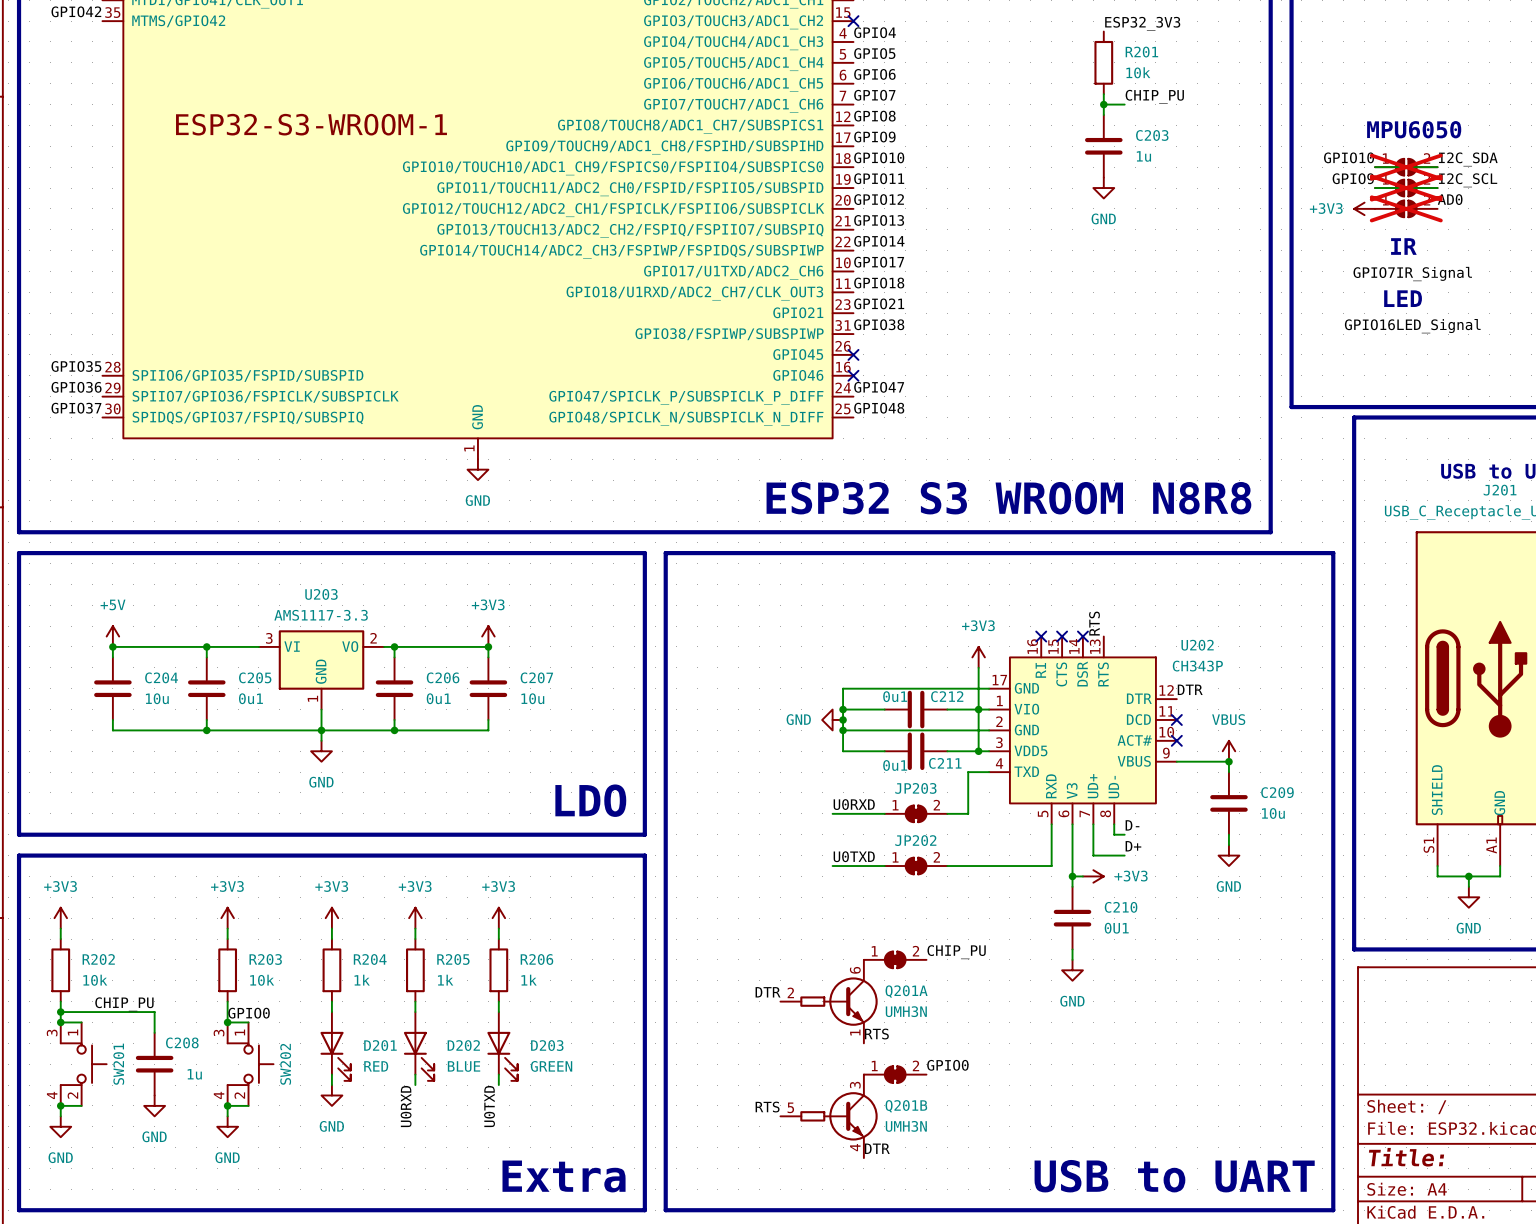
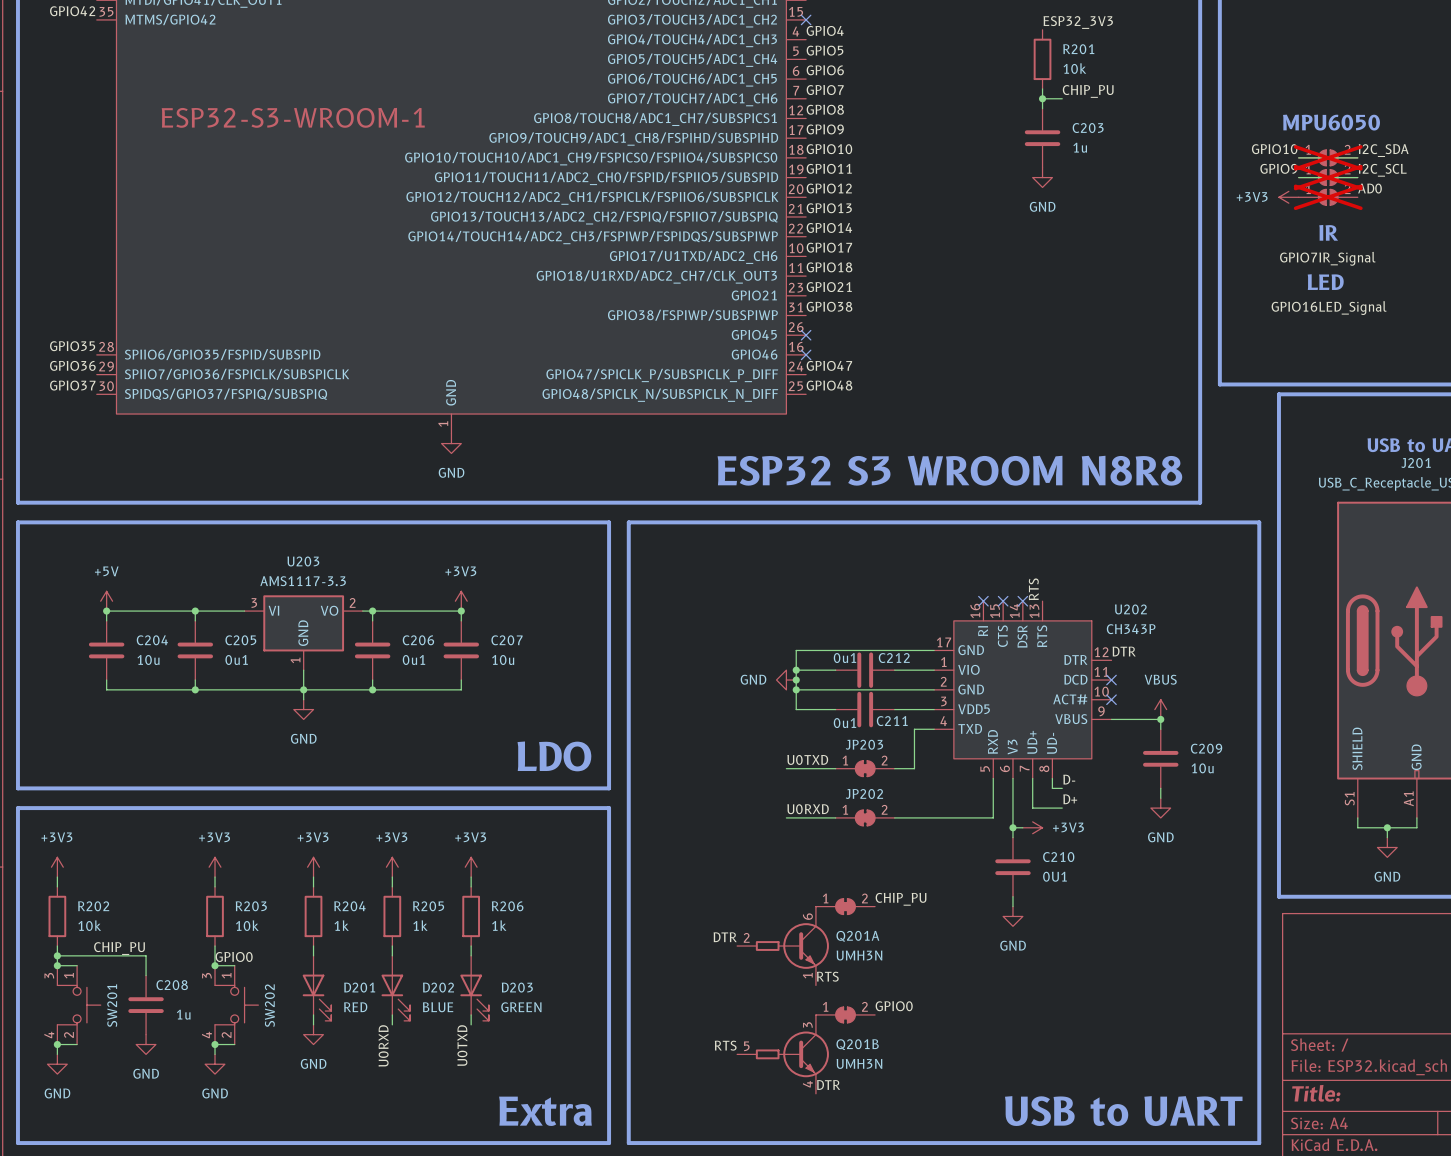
power symbol: +3V3 (978, 657) -> none
wire: (978, 667) (978, 751) -> none
junction: (978, 709) -> none
junction: (978, 751) -> none
label: U0RXD (854, 804) -> U0TXD (807, 759)
label: U0TXD (854, 856) -> U0RXD (808, 809)

